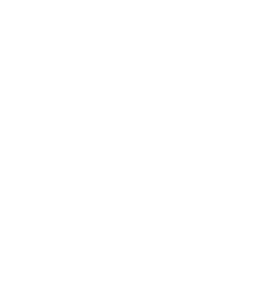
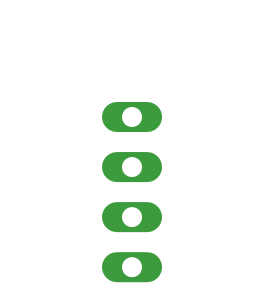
part: none -> (132, 192)

